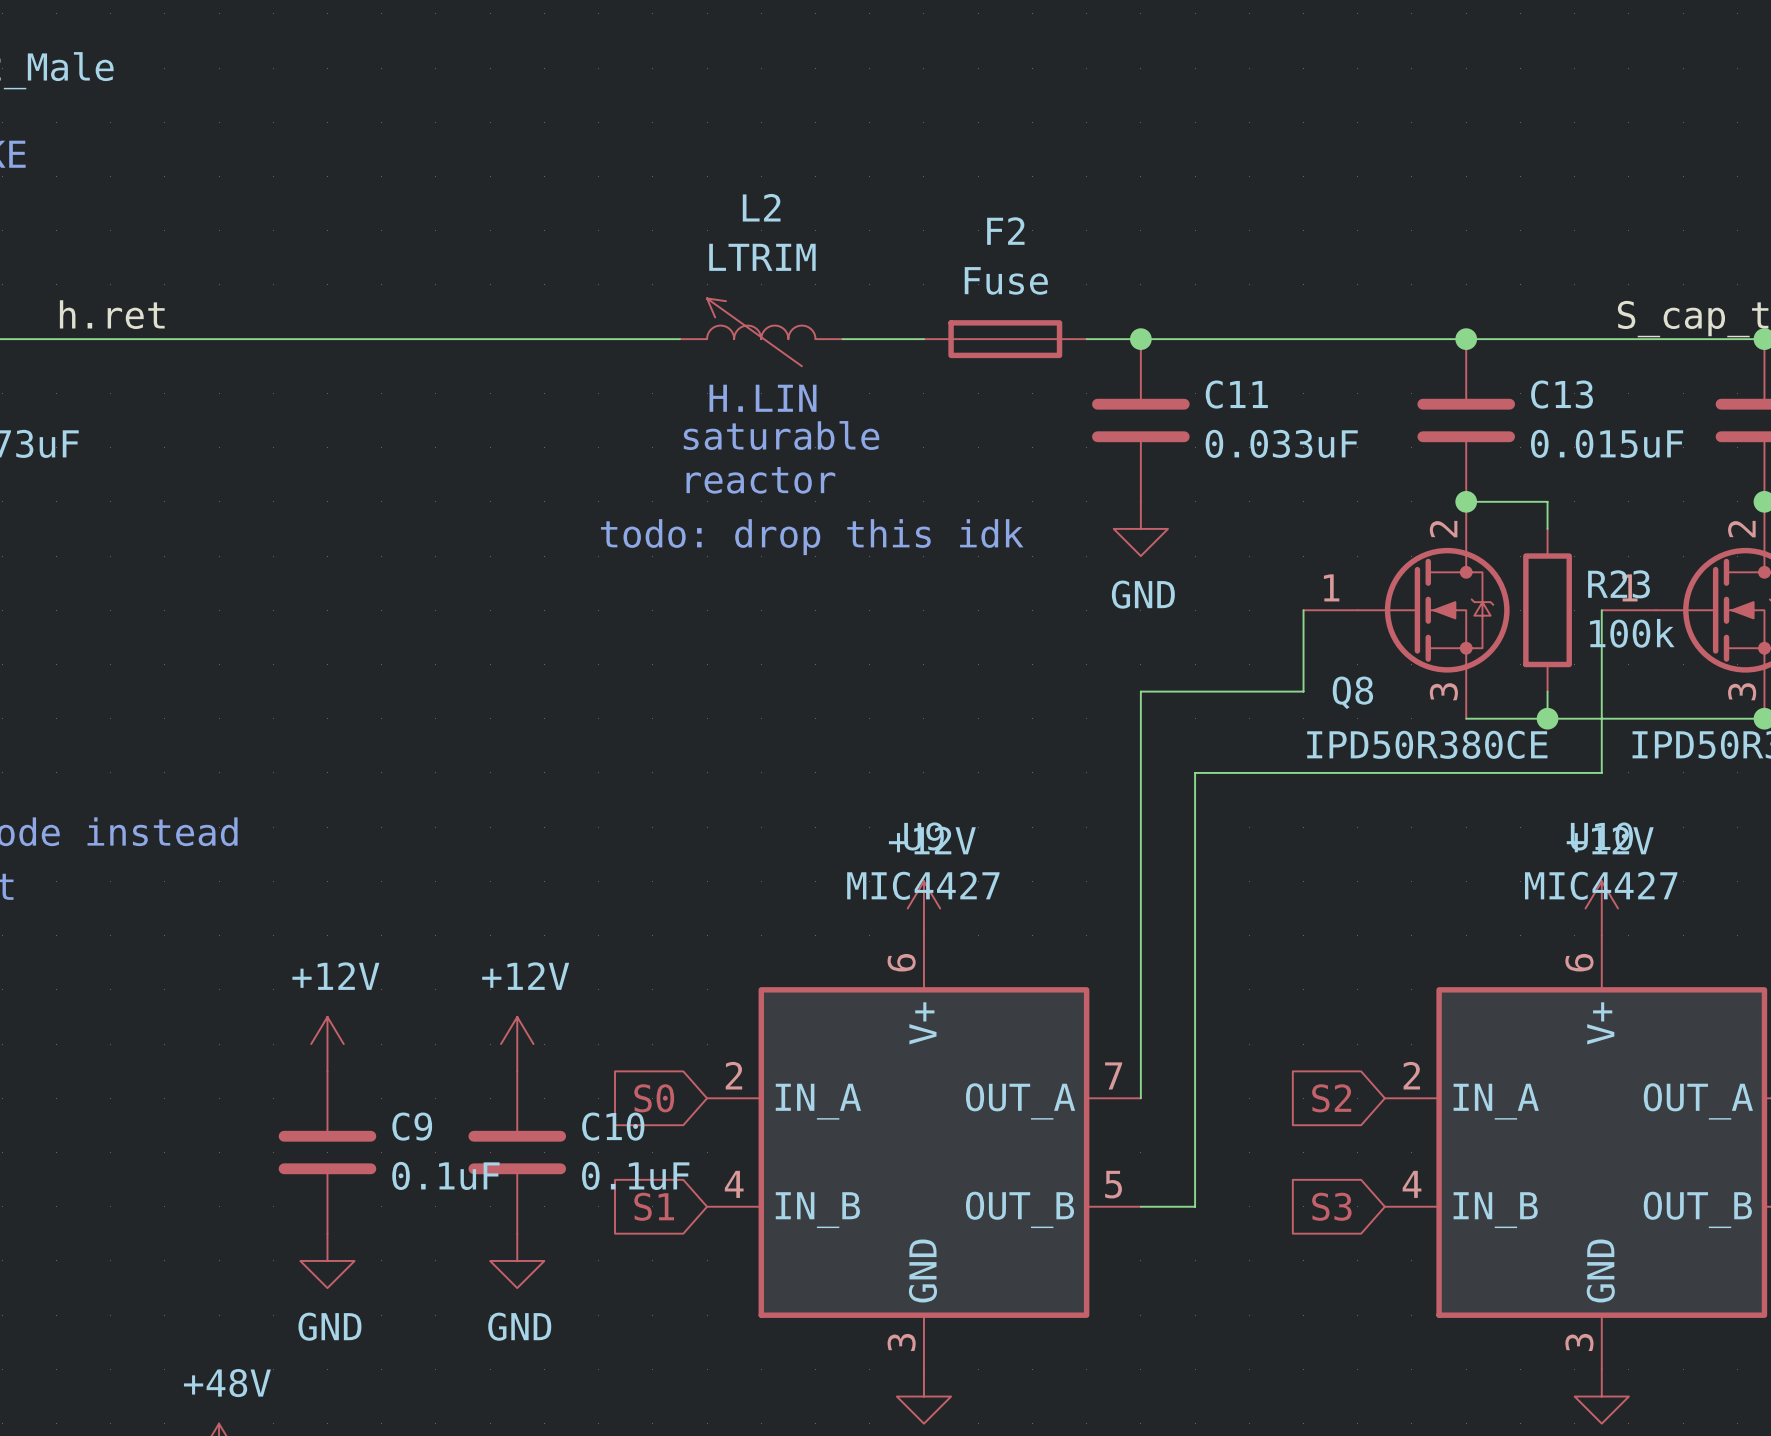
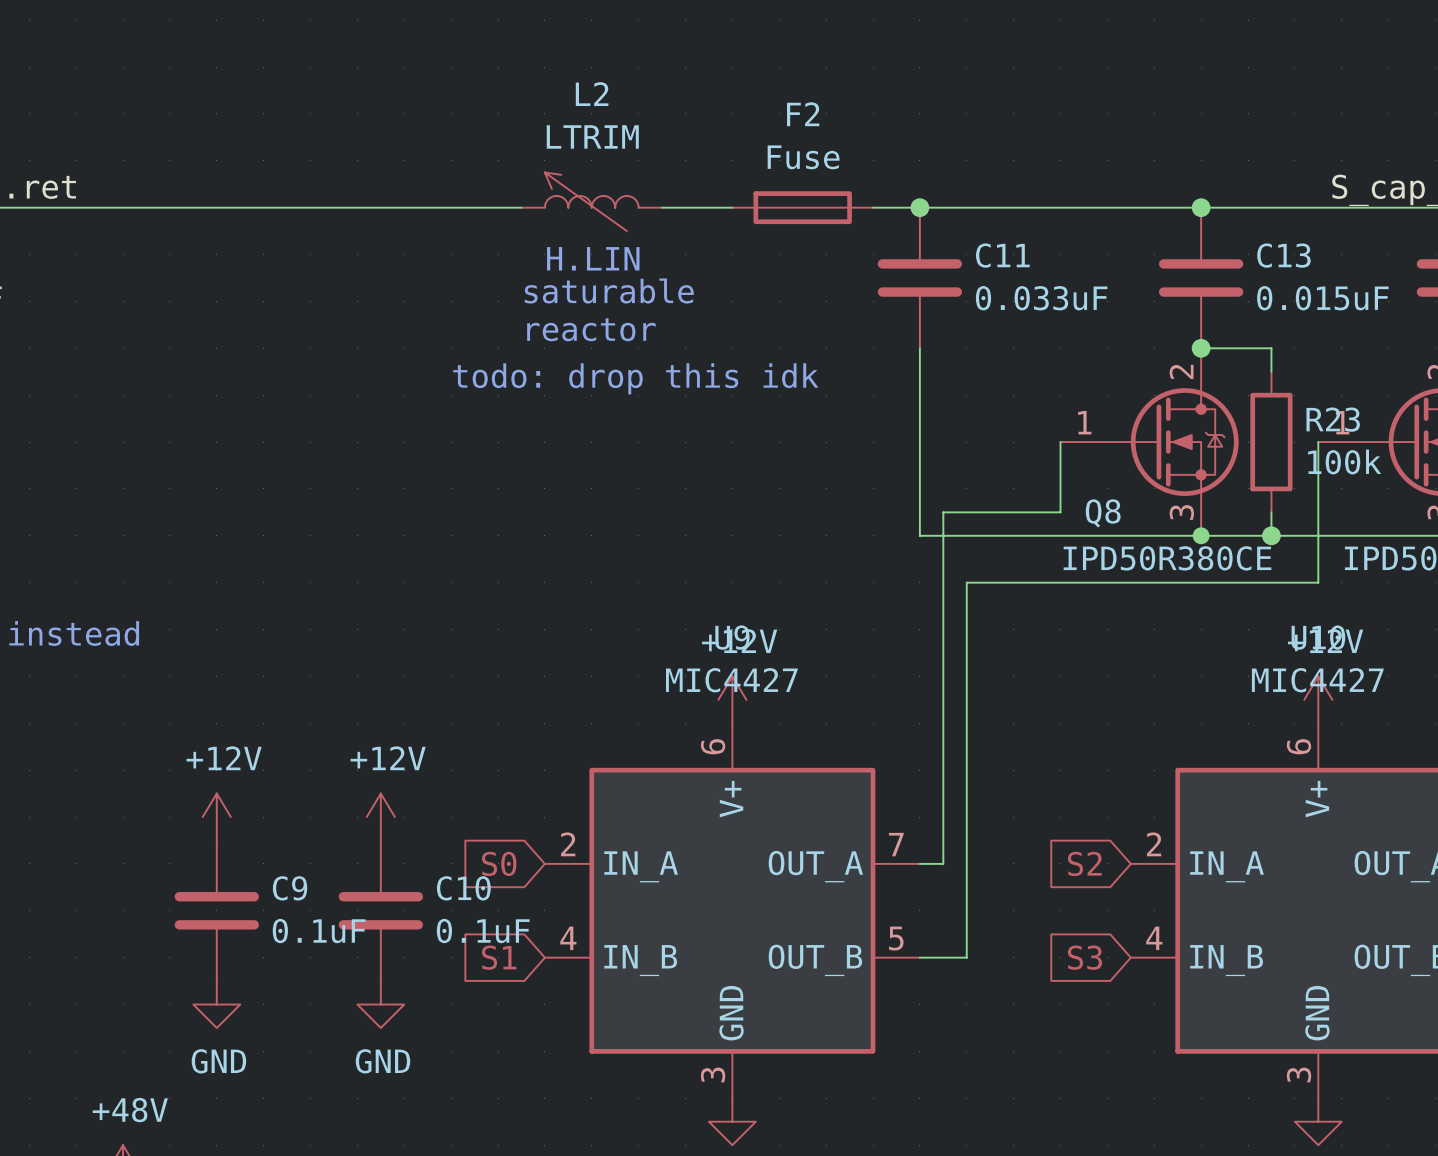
power symbol: GND (1140, 528) -> none
wire: (1140, 691) (1167, 691) -> (919, 512) (919, 348)
wire: (1140, 718) (1140, 1098) -> (943, 512) (943, 863) (919, 863)
wire: none -> (919, 535) (1201, 535)
junction: none -> (1201, 535)

